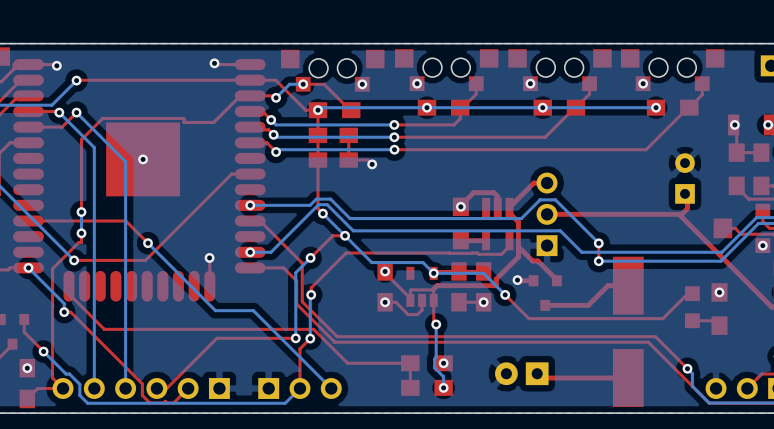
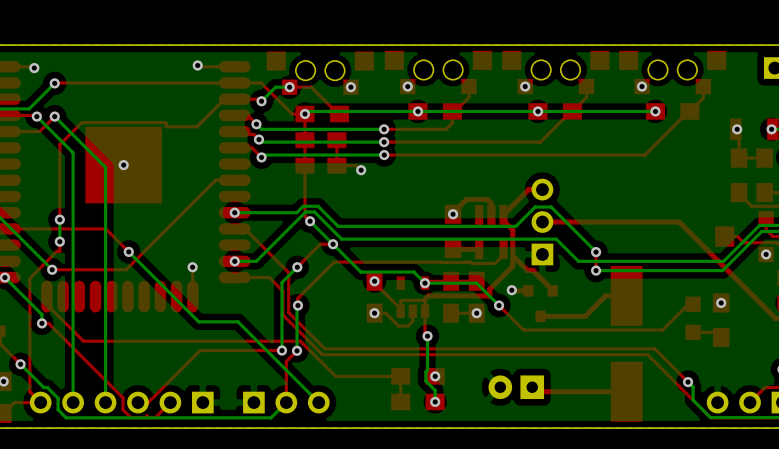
part: (685, 178) -> none
top track: (687, 193) (687, 208) (681, 214) (679, 214) -> none

